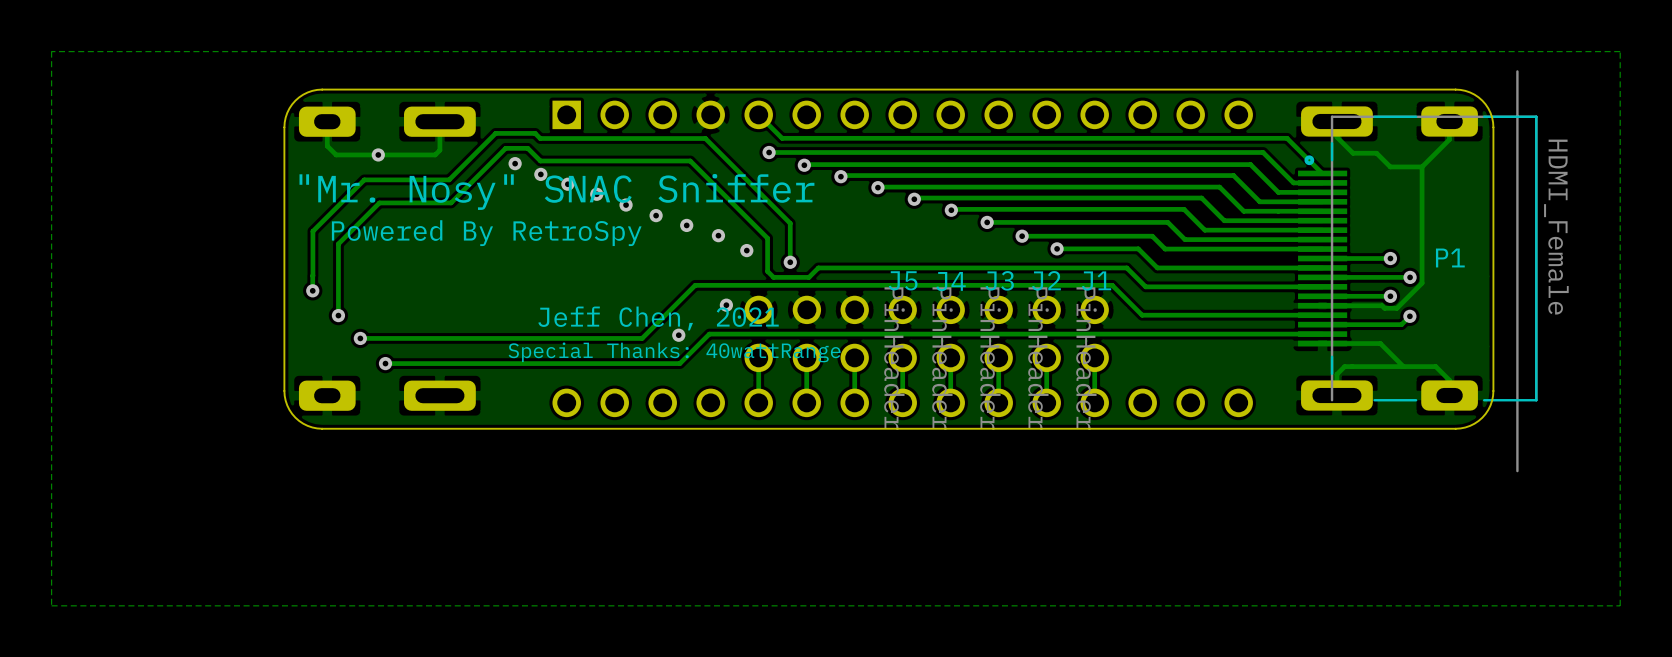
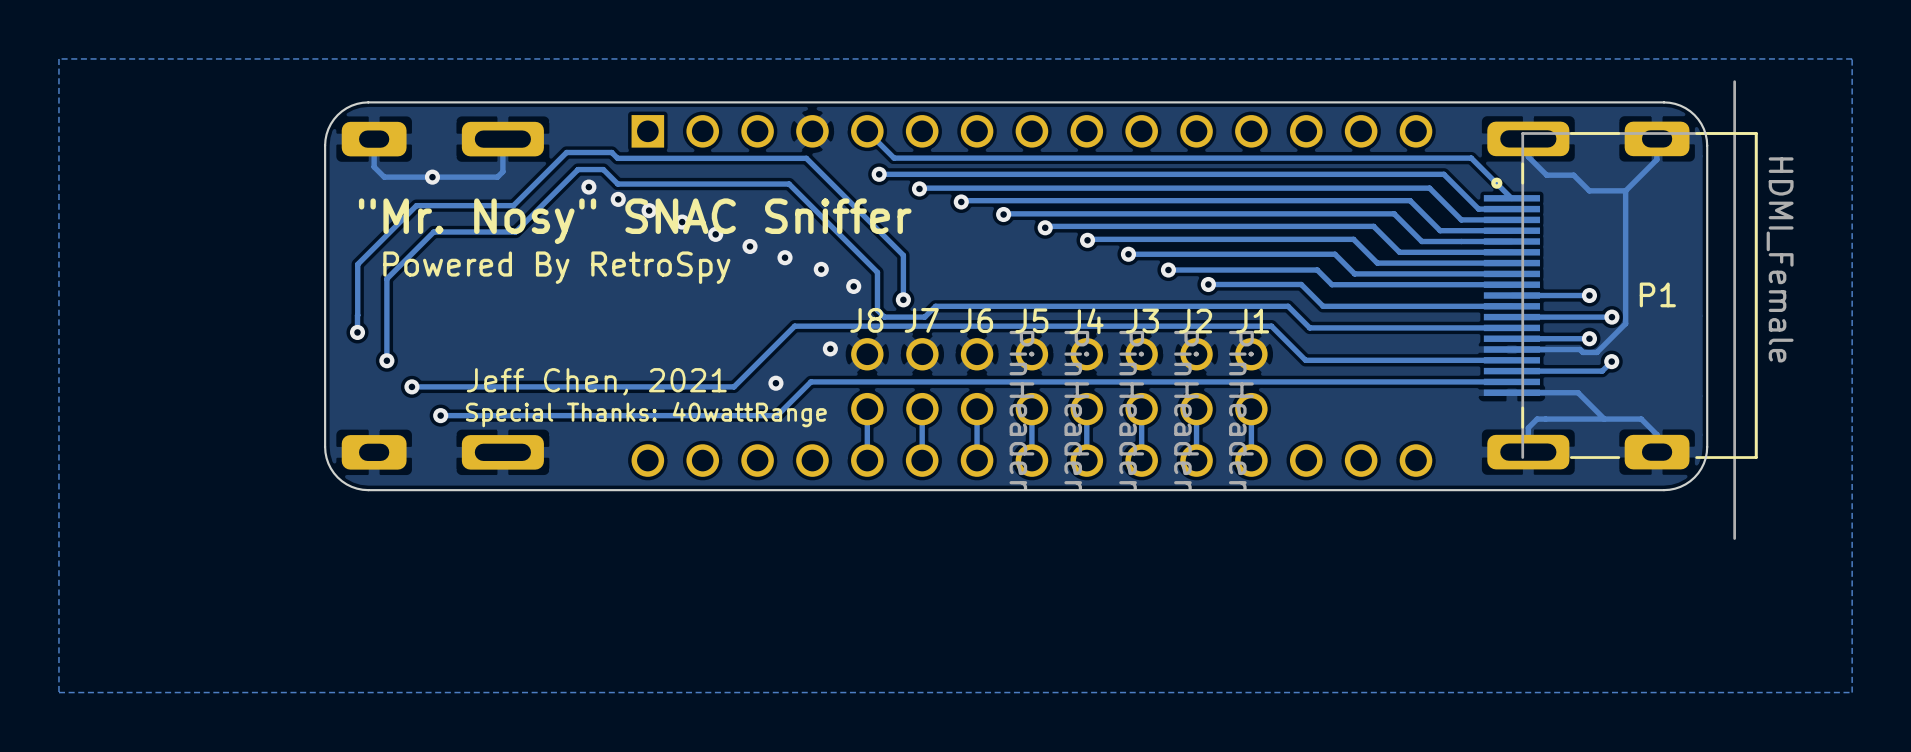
J8 name: none -> J8 (866, 320)
J7 name: none -> J7 (921, 320)
J6 name: none -> J6 (976, 320)
text position: Jeff Chen, 2021 (658, 318) -> Jeff Chen, 2021 (596, 381)
text position: Special Thanks: 40wattRange (674, 352) -> Special Thanks: 40wattRange (646, 414)

